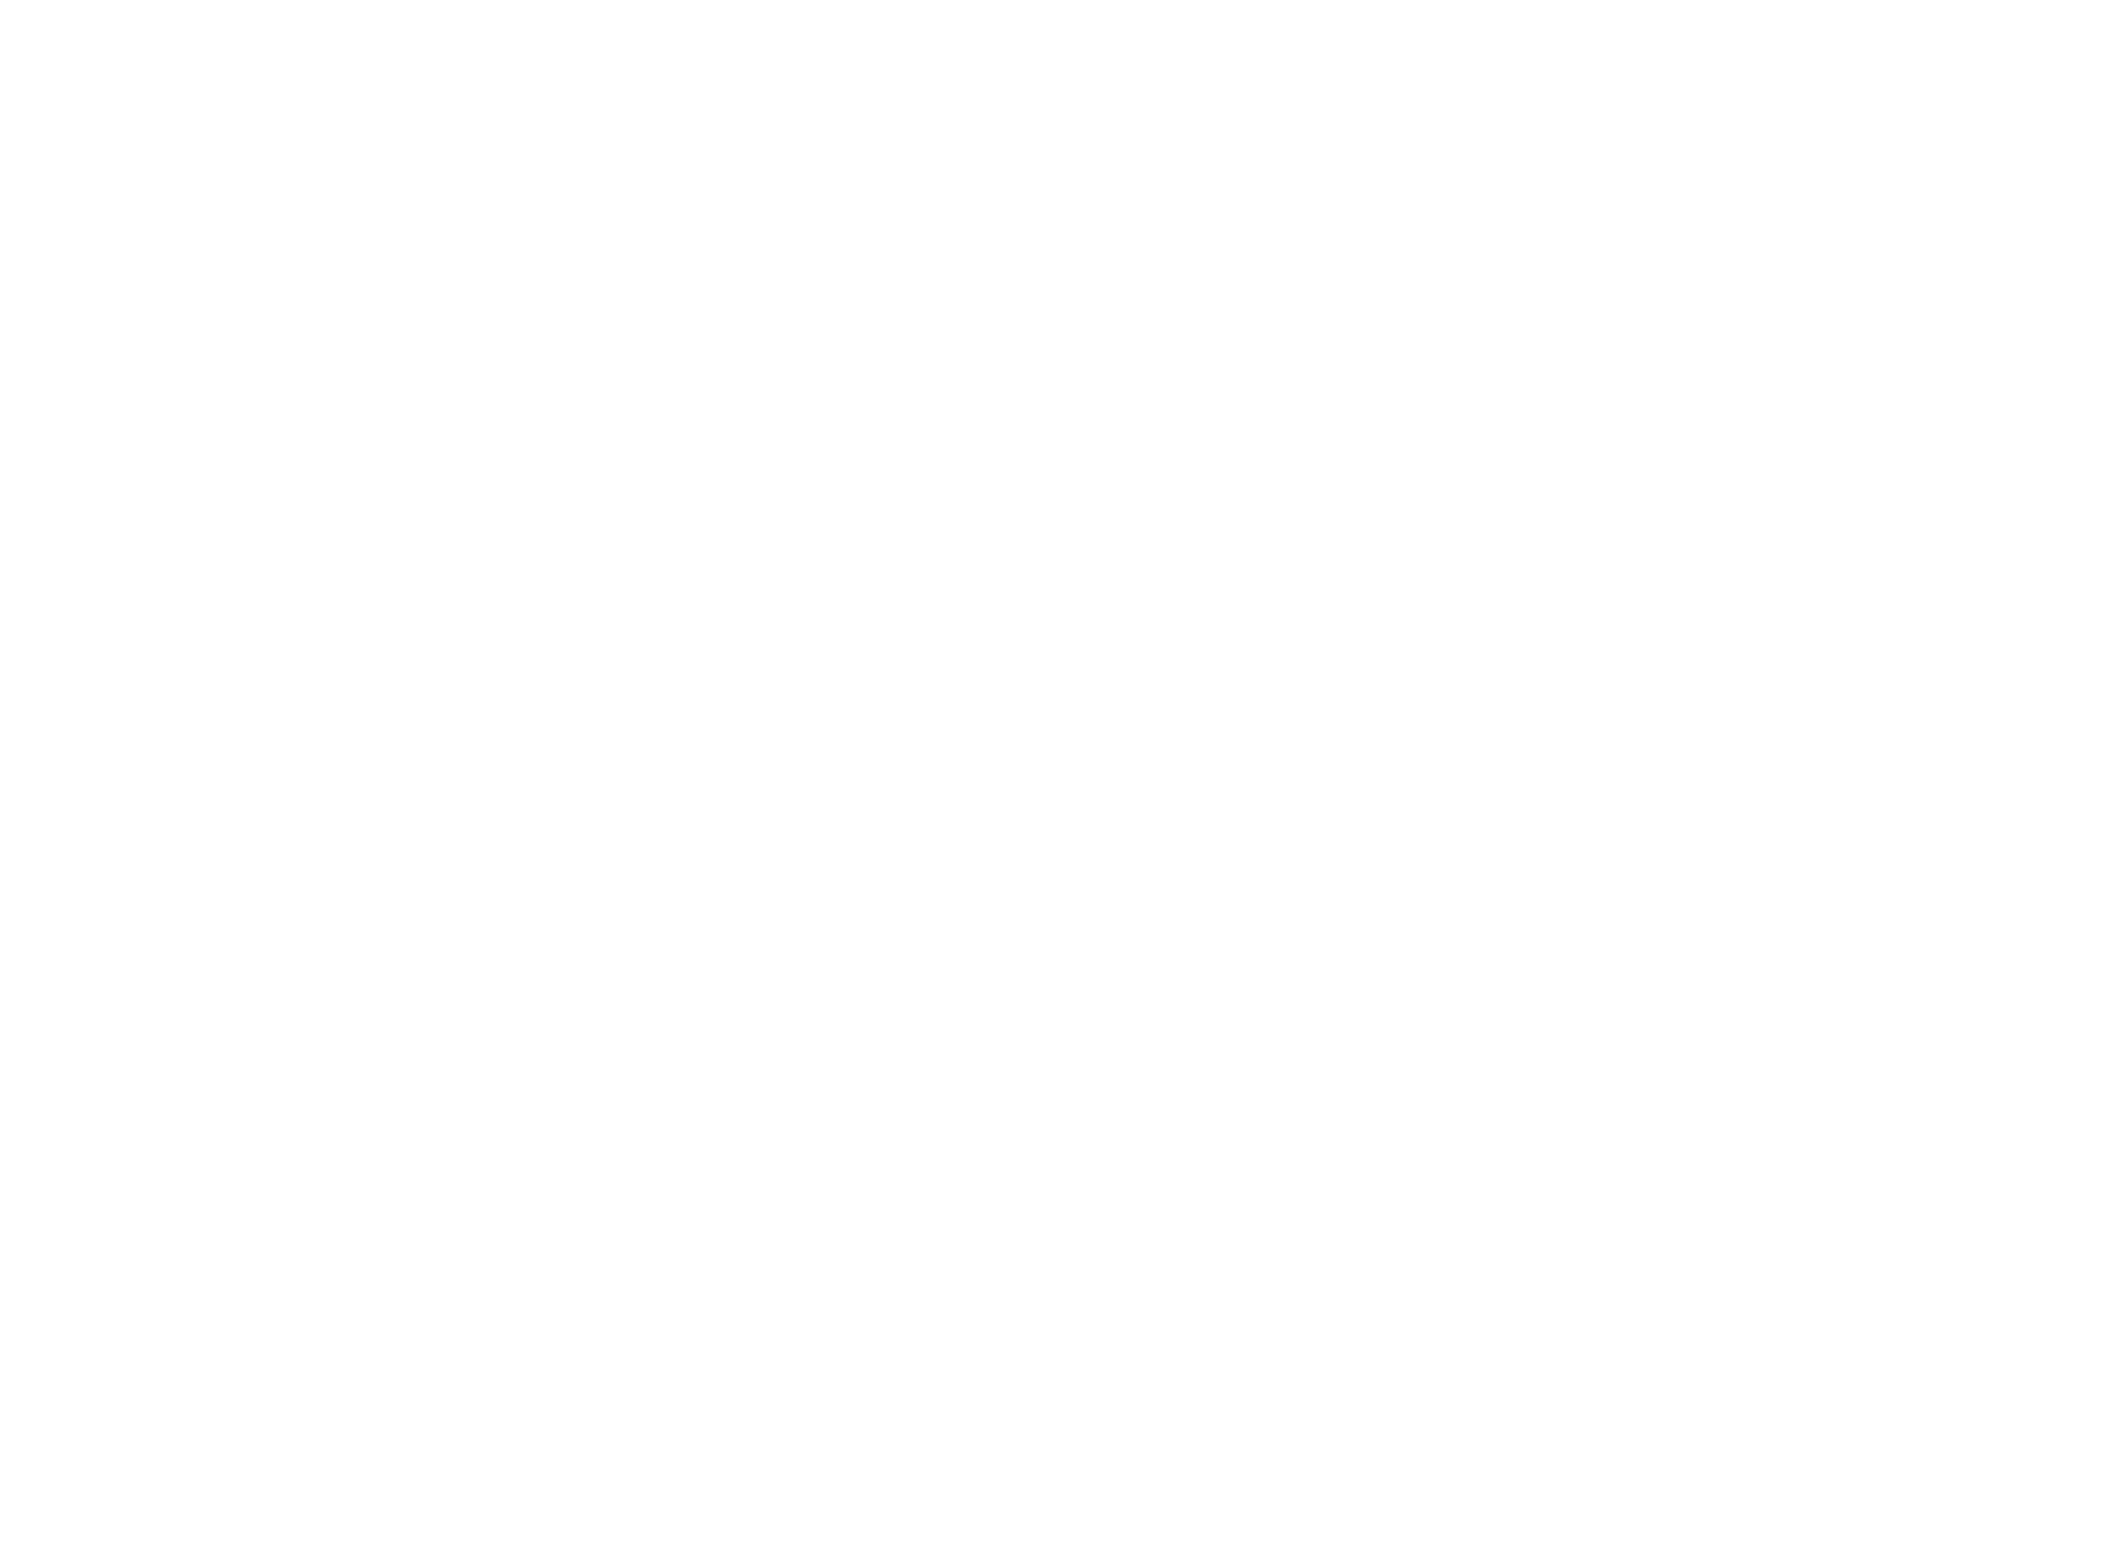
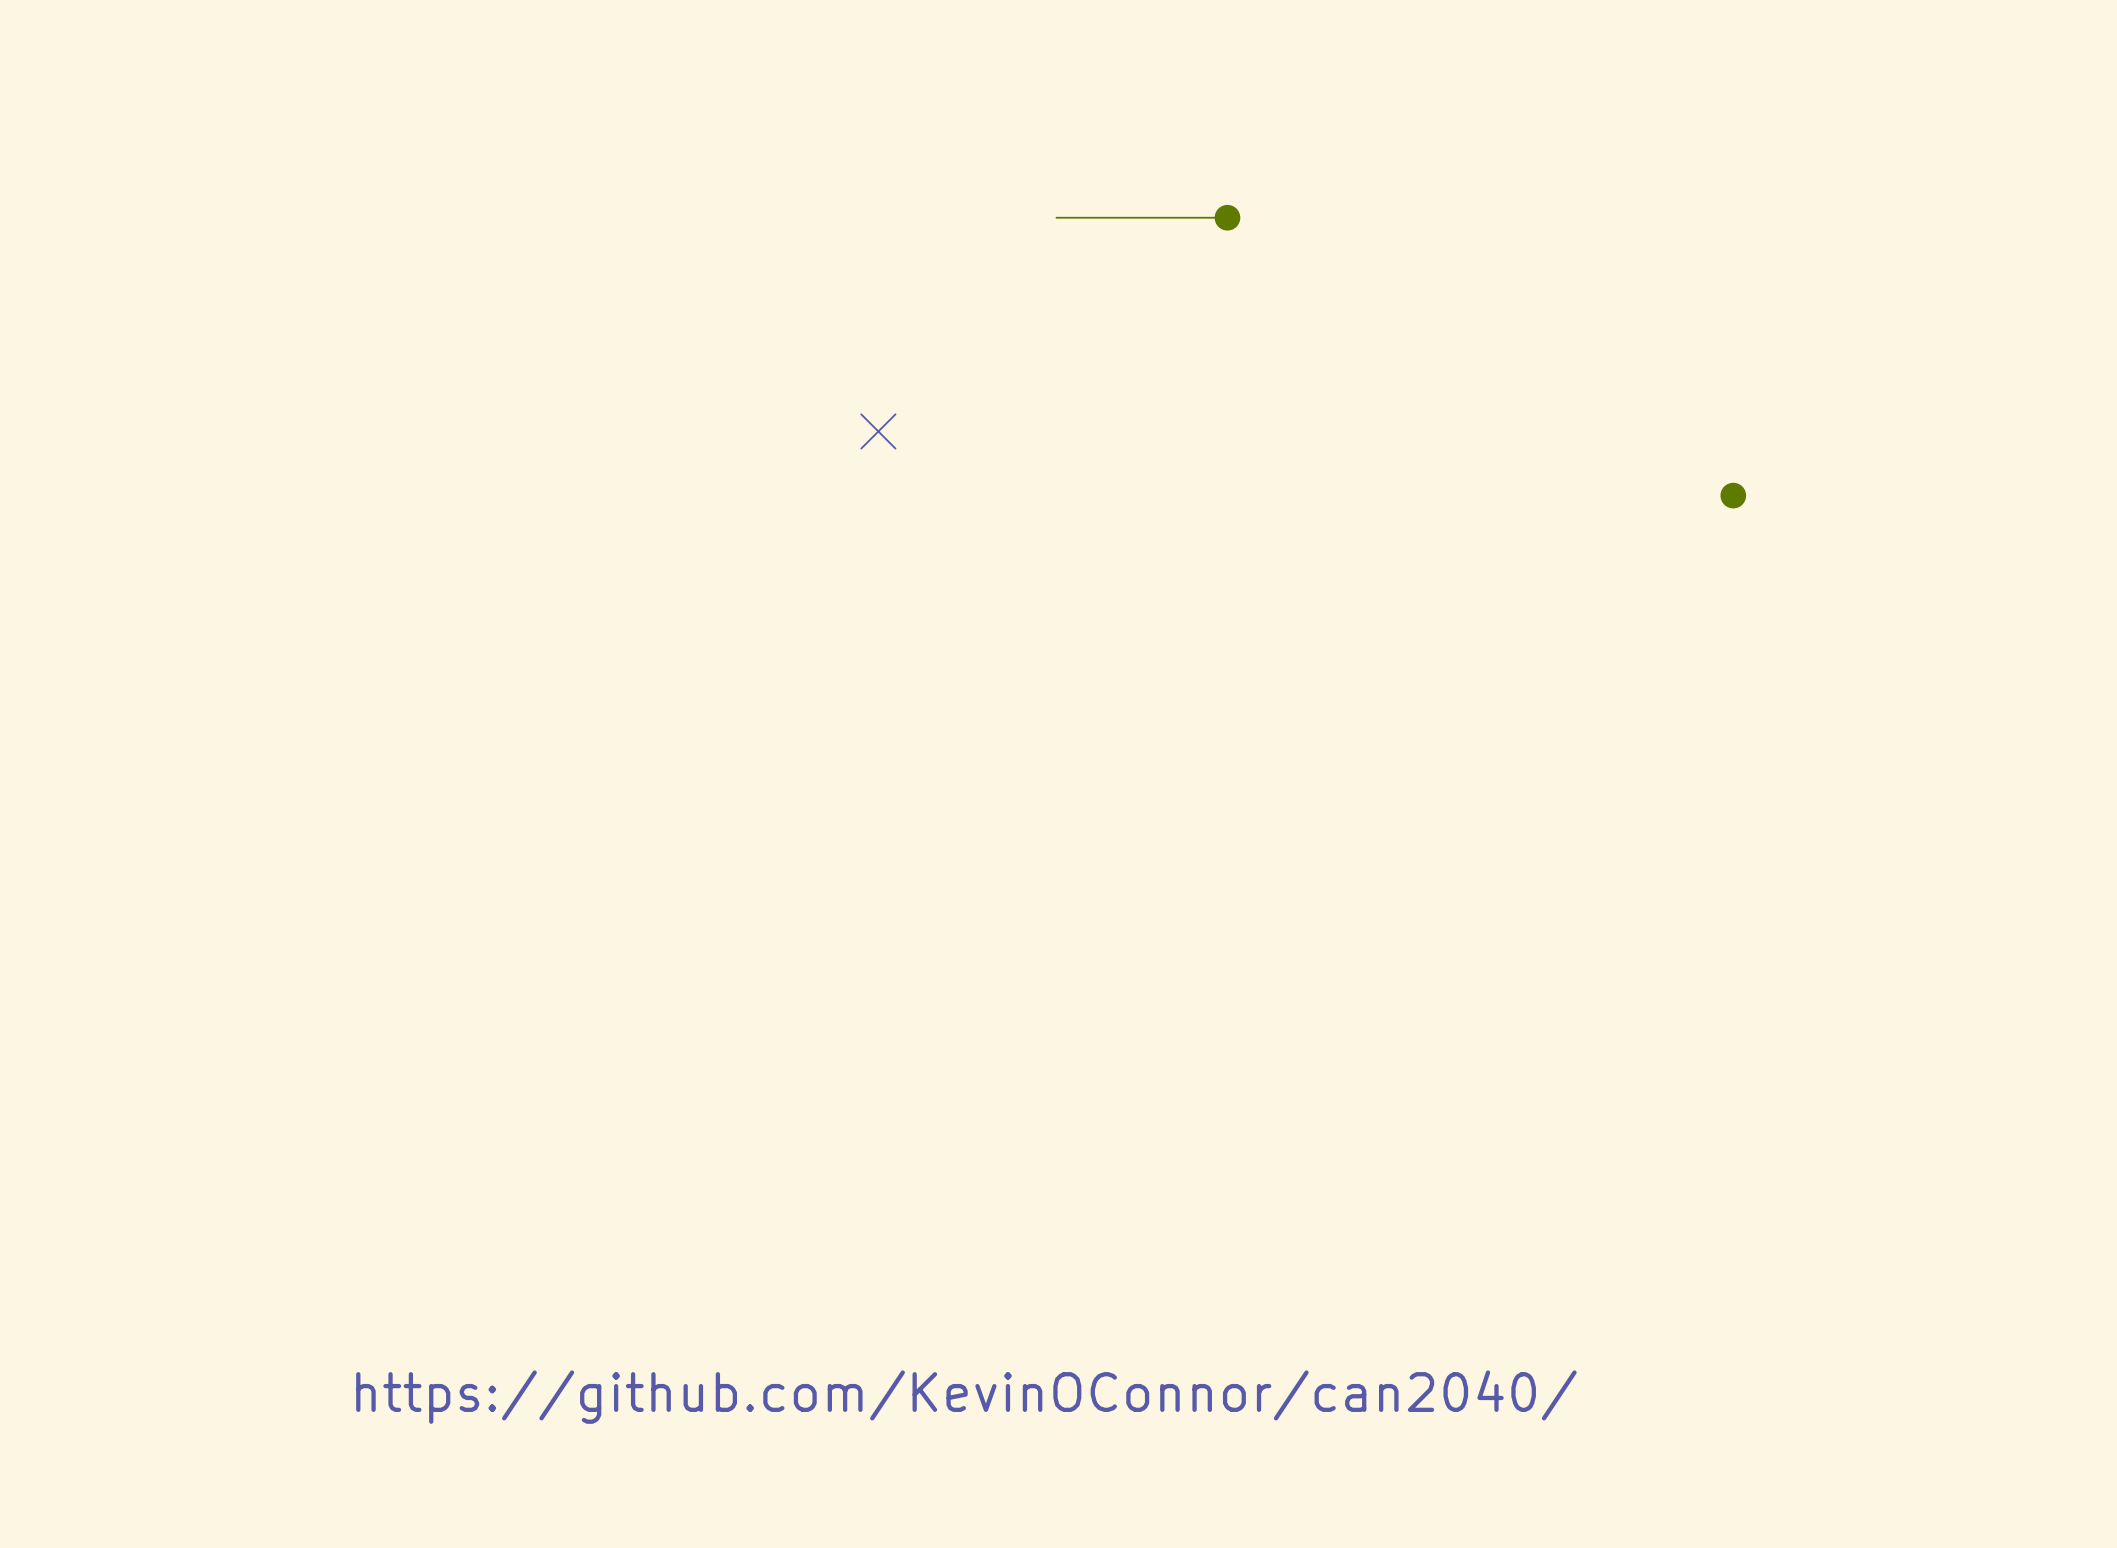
wire: none -> (1056, 217) (1227, 217)
junction: none -> (1227, 217)
no-connect mark: none -> (878, 431)
junction: none -> (1733, 495)
text: none -> https://github.com/KevinOConnor/can2040/ (966, 1397)

